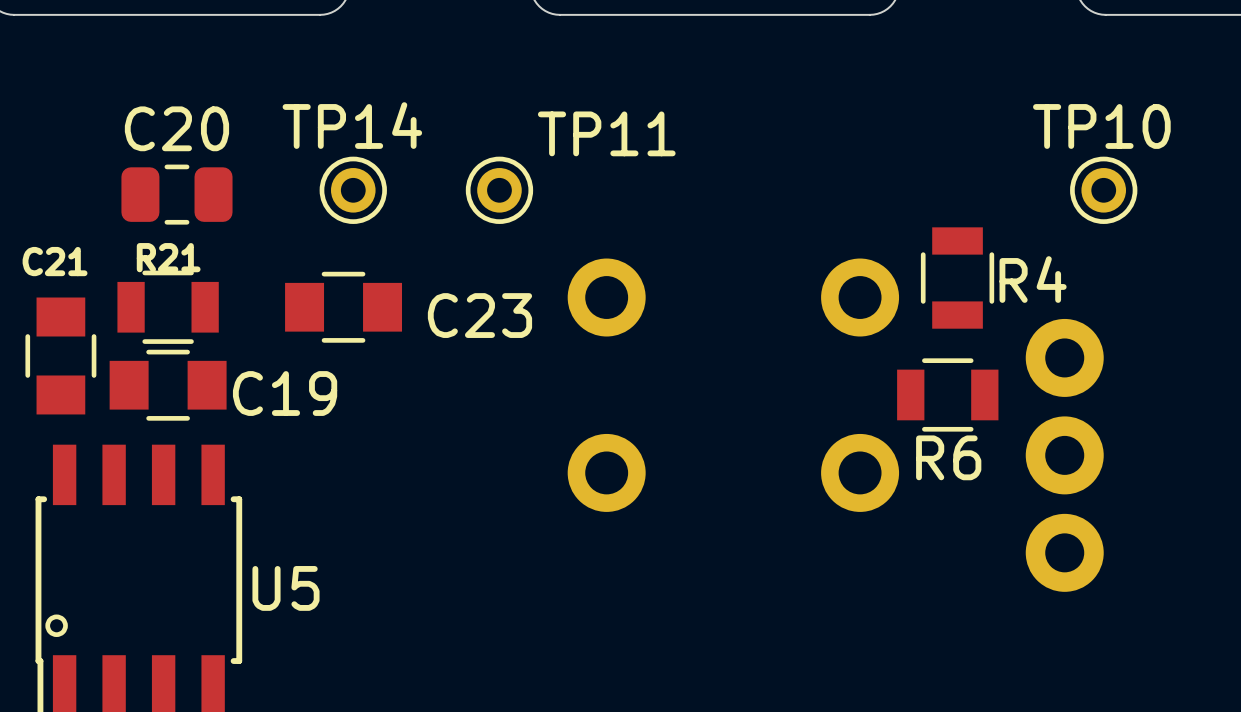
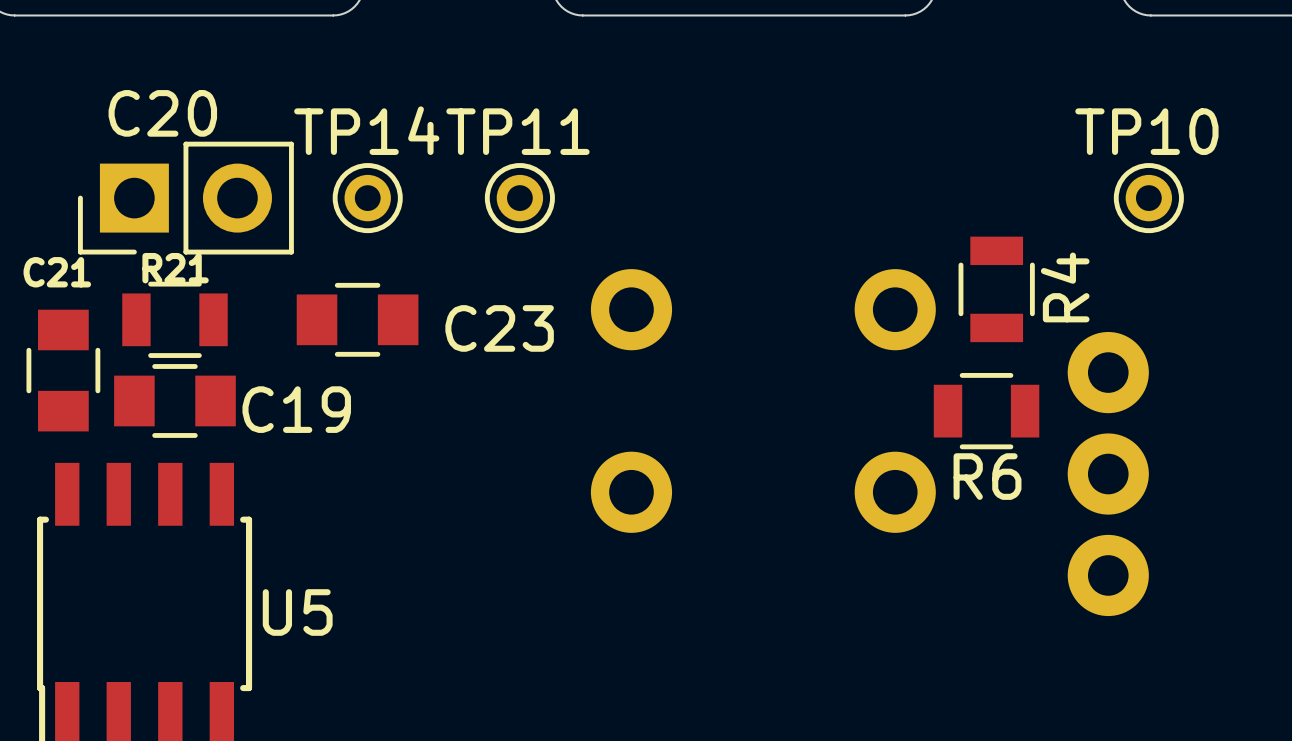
TP11 name position: TP11 (606, 133) -> TP11 (517, 131)
C20 footprint: [121, 164, 233, 225] -> [78, 141, 294, 255]
R4 name rotation: 0° (1033, 279) -> 90° counterclockwise (1065, 287)
drawing: [45, 614, 68, 638] -> none

